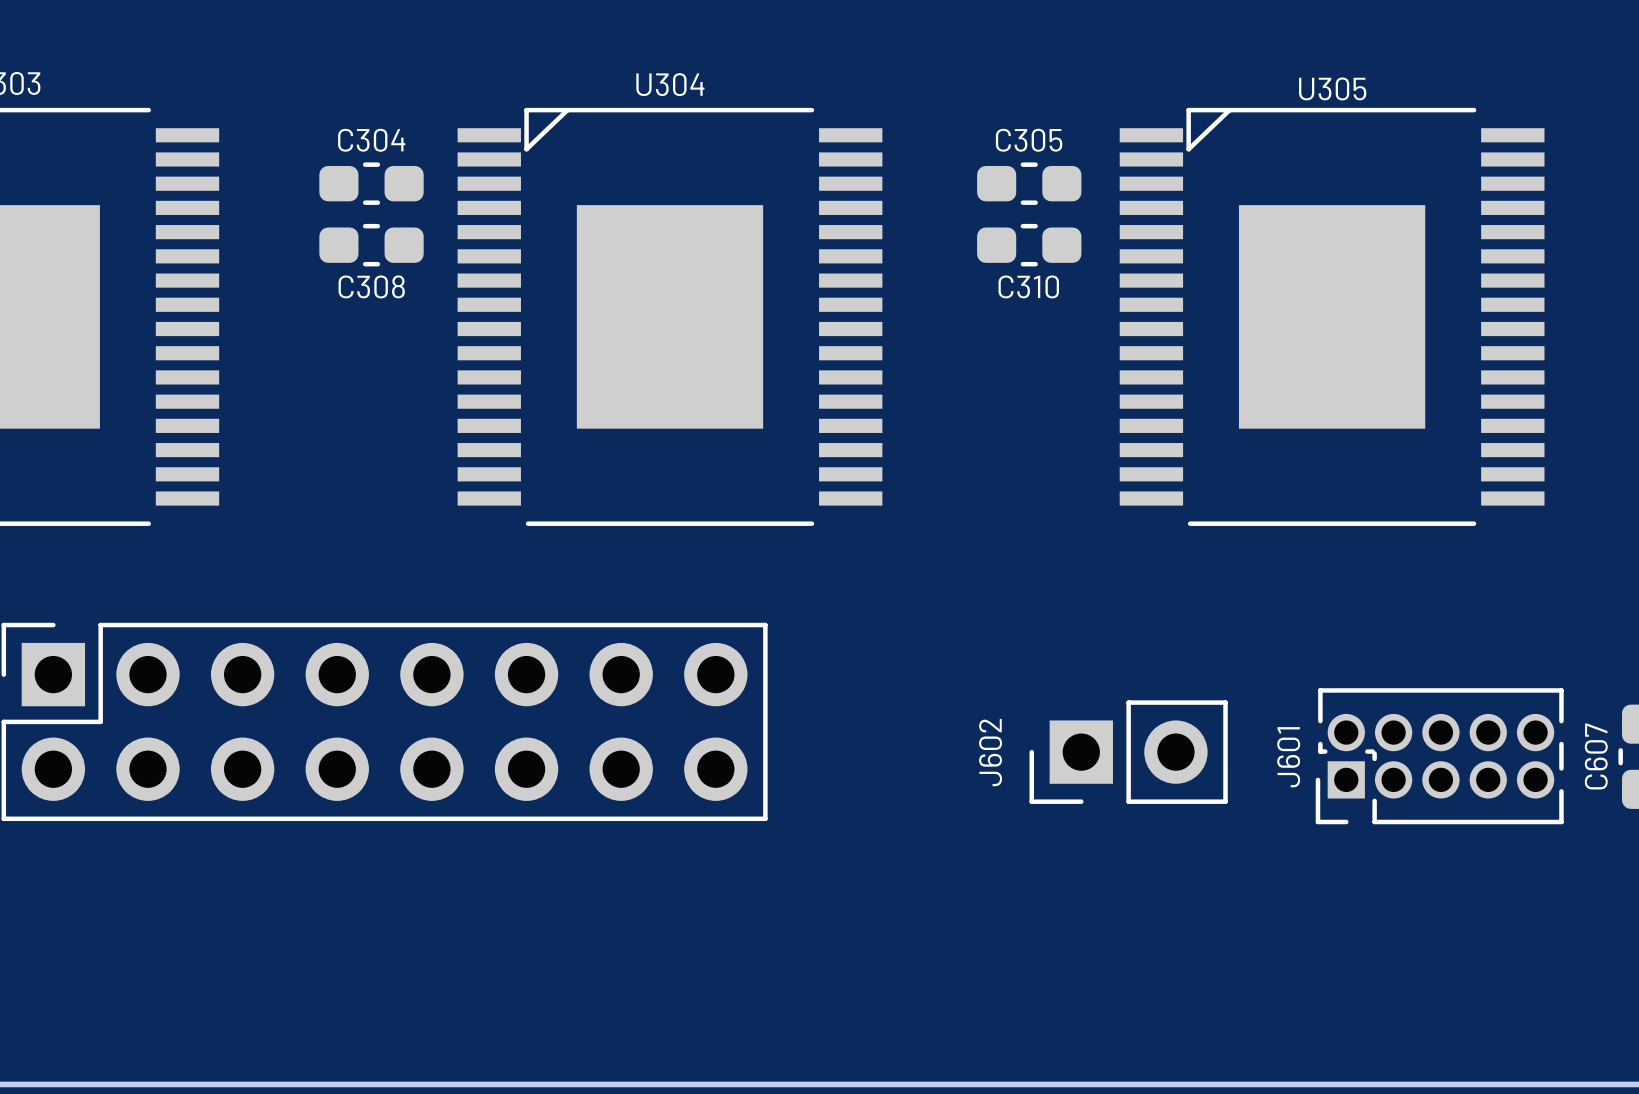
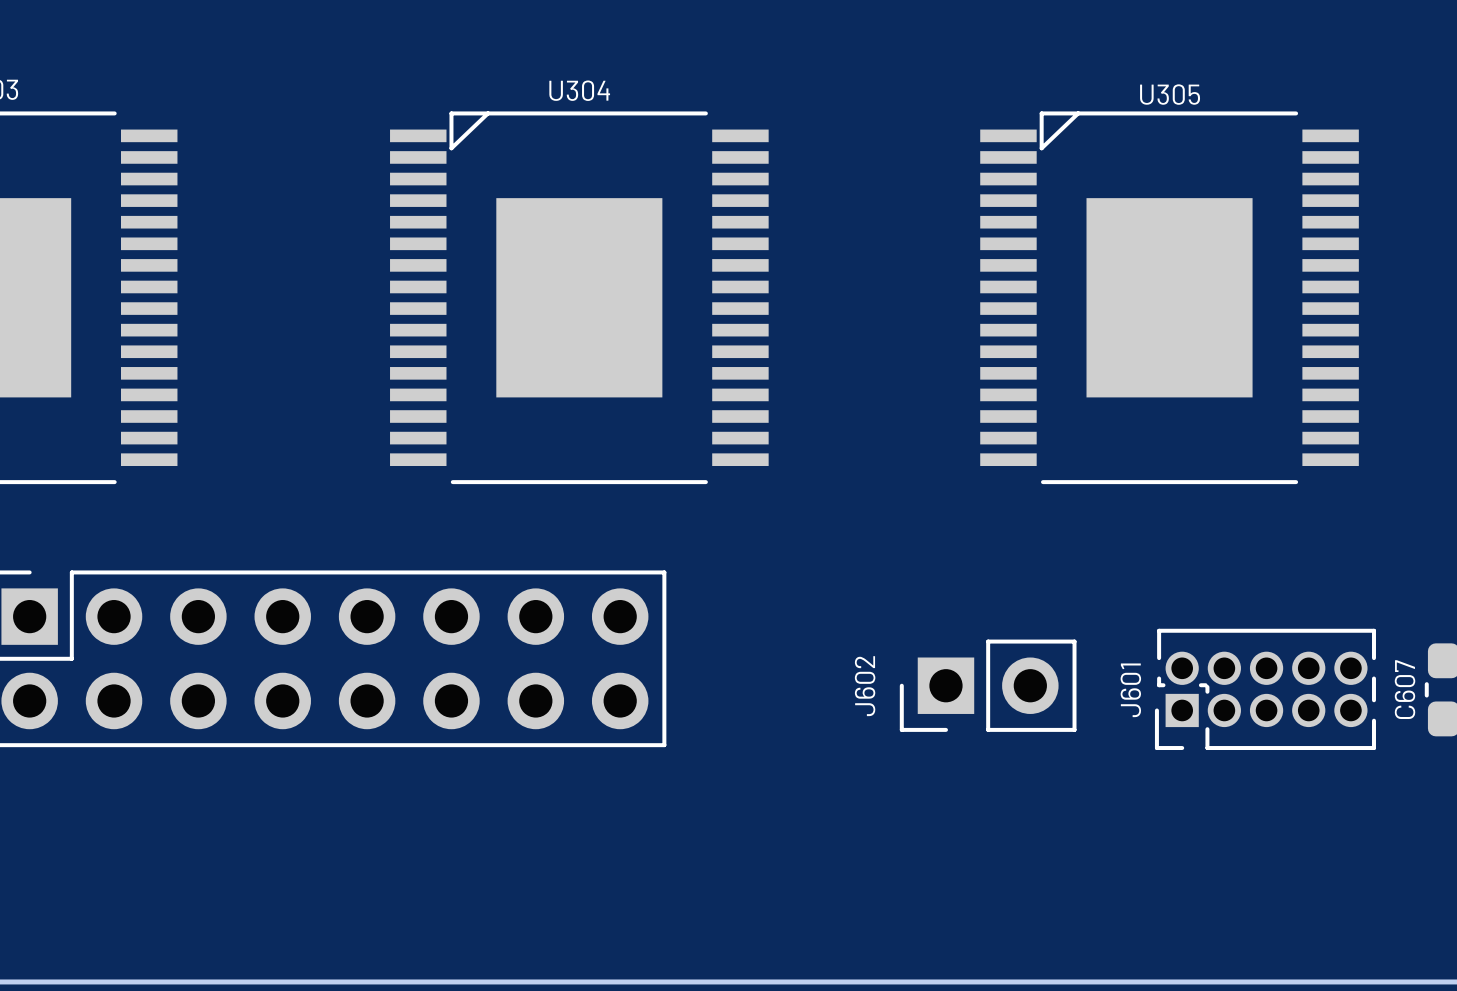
C304: (371, 183) -> none
C305: (1029, 183) -> none
C308: (371, 245) -> none
C310: (1029, 245) -> none

